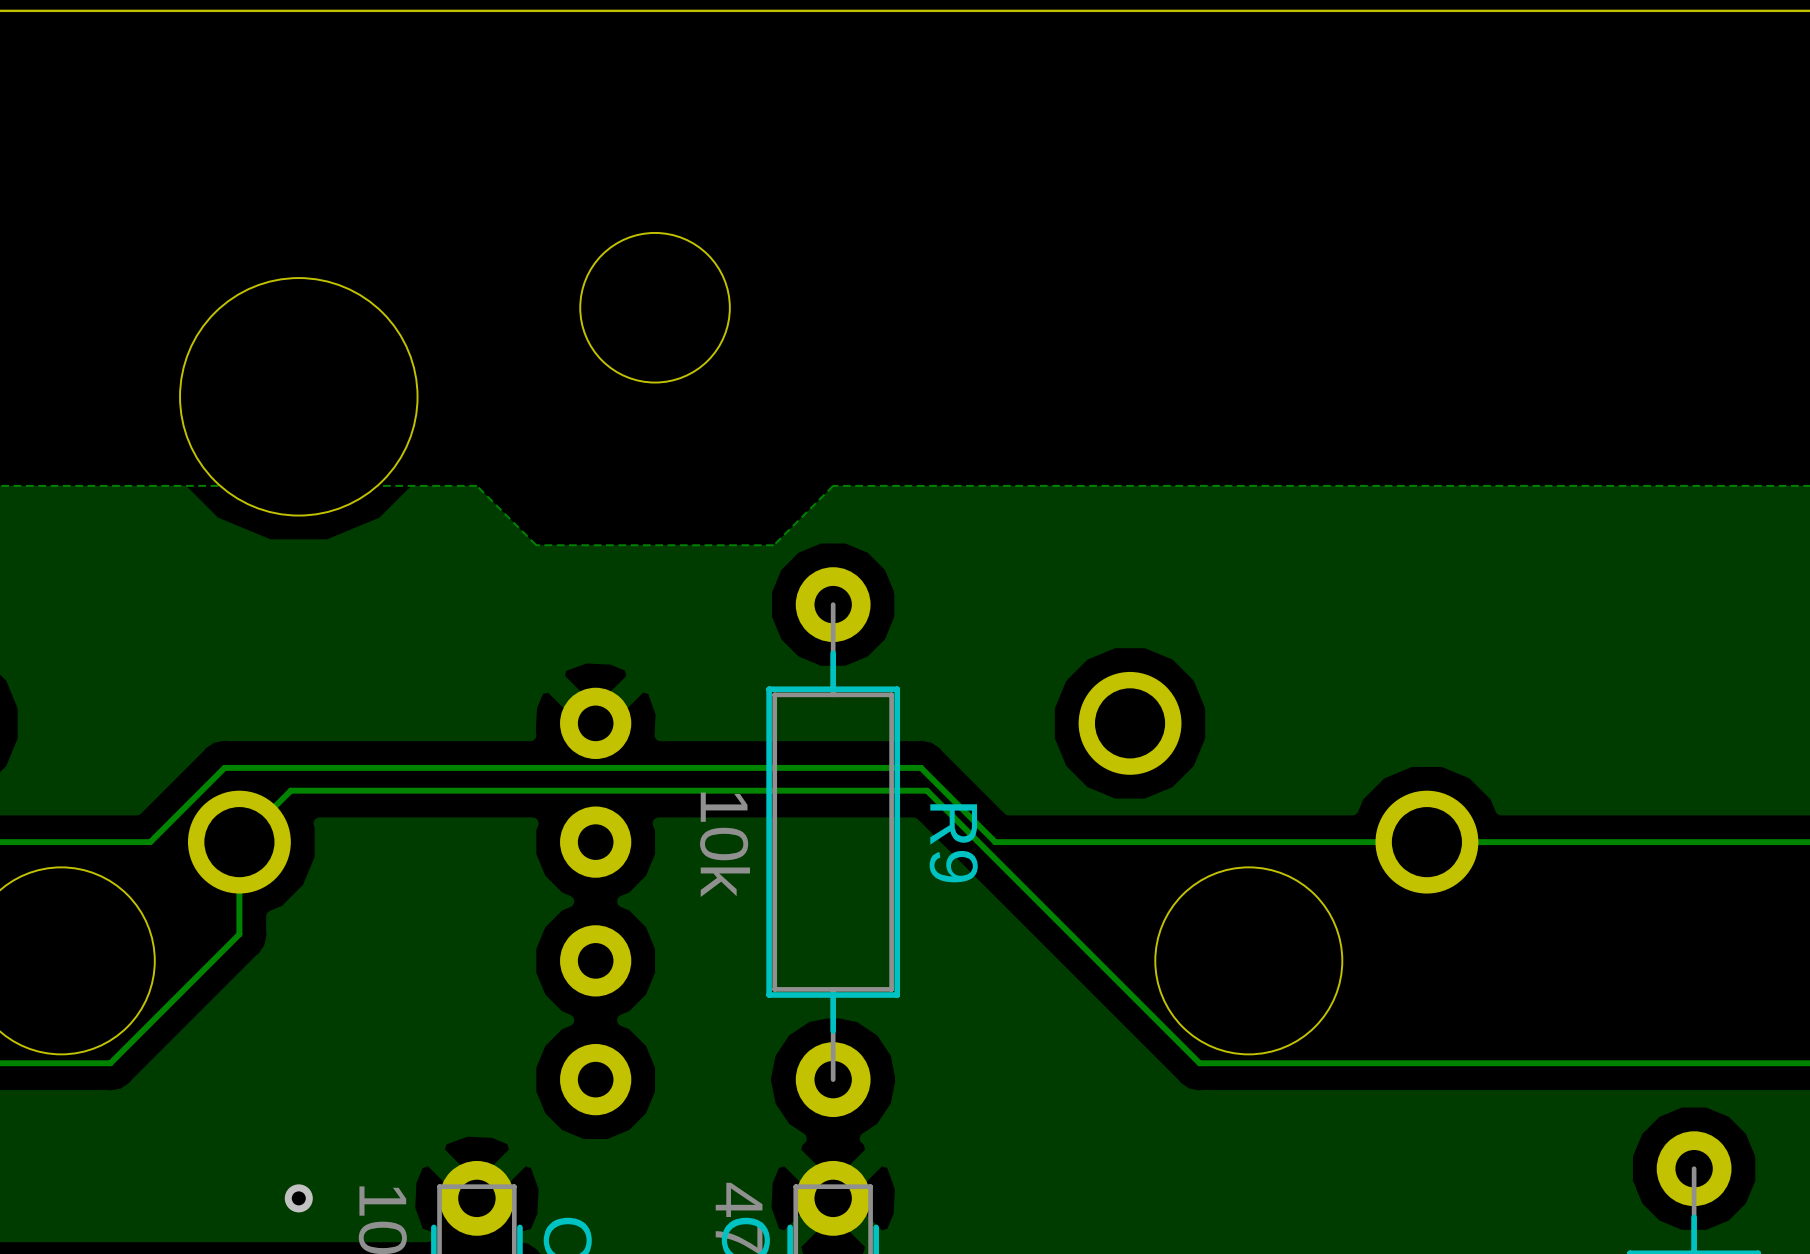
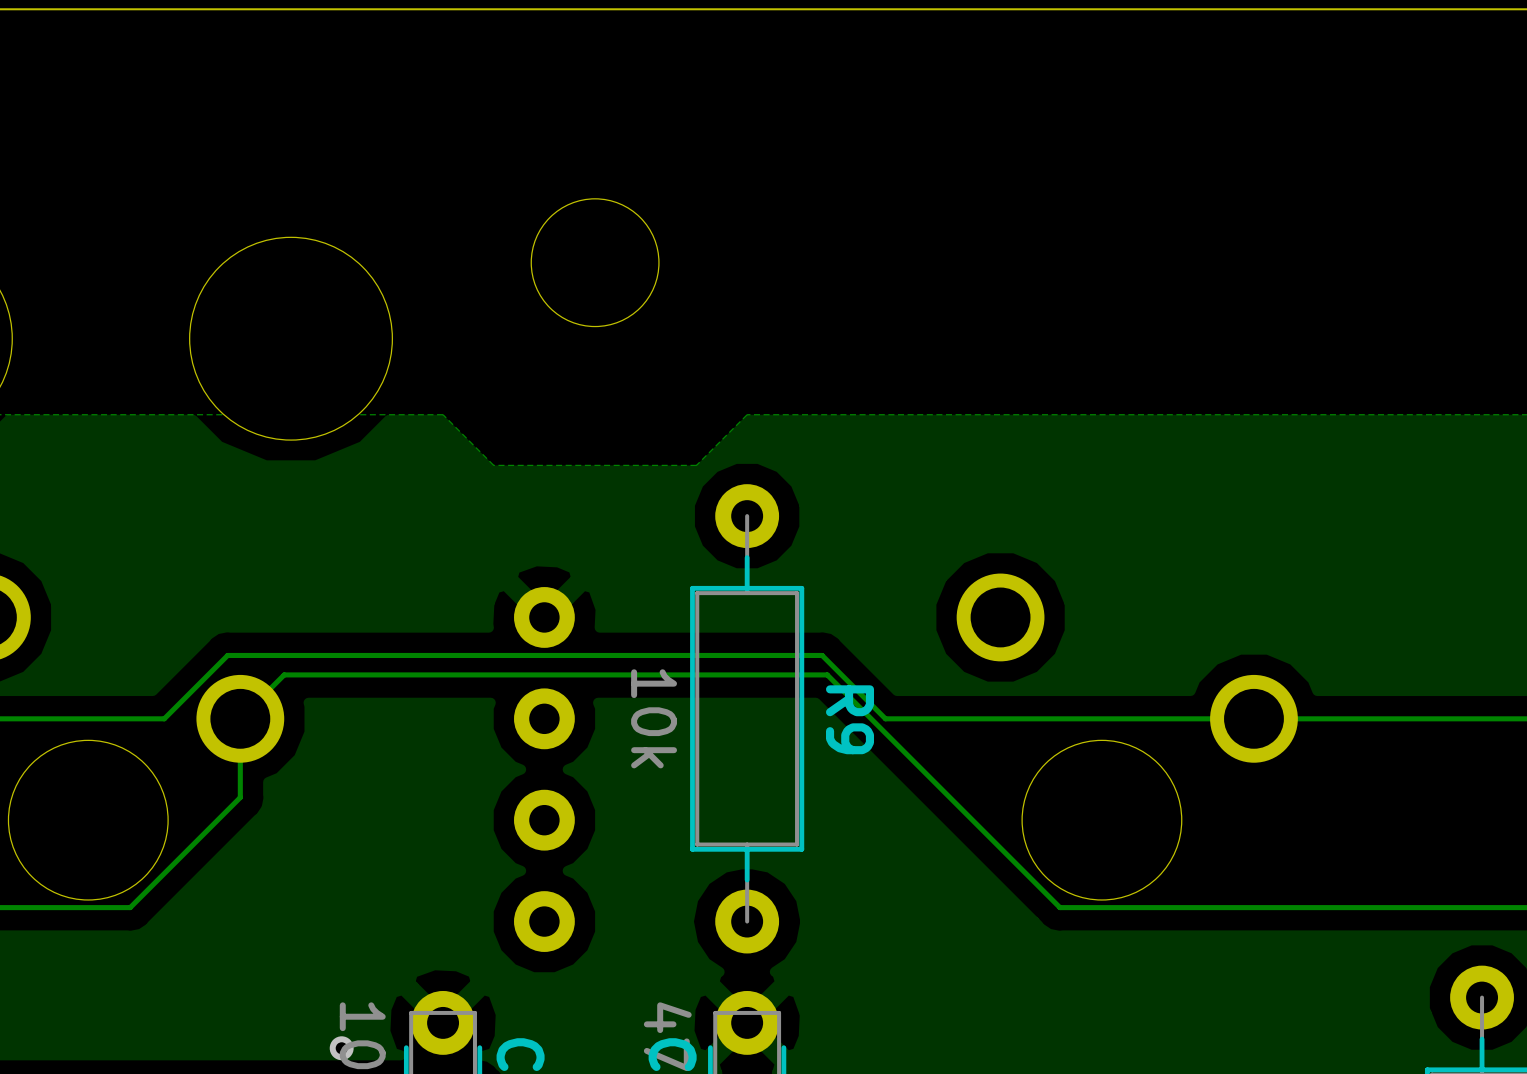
via: (298, 1198) -> none
via: none -> (341, 1048)

